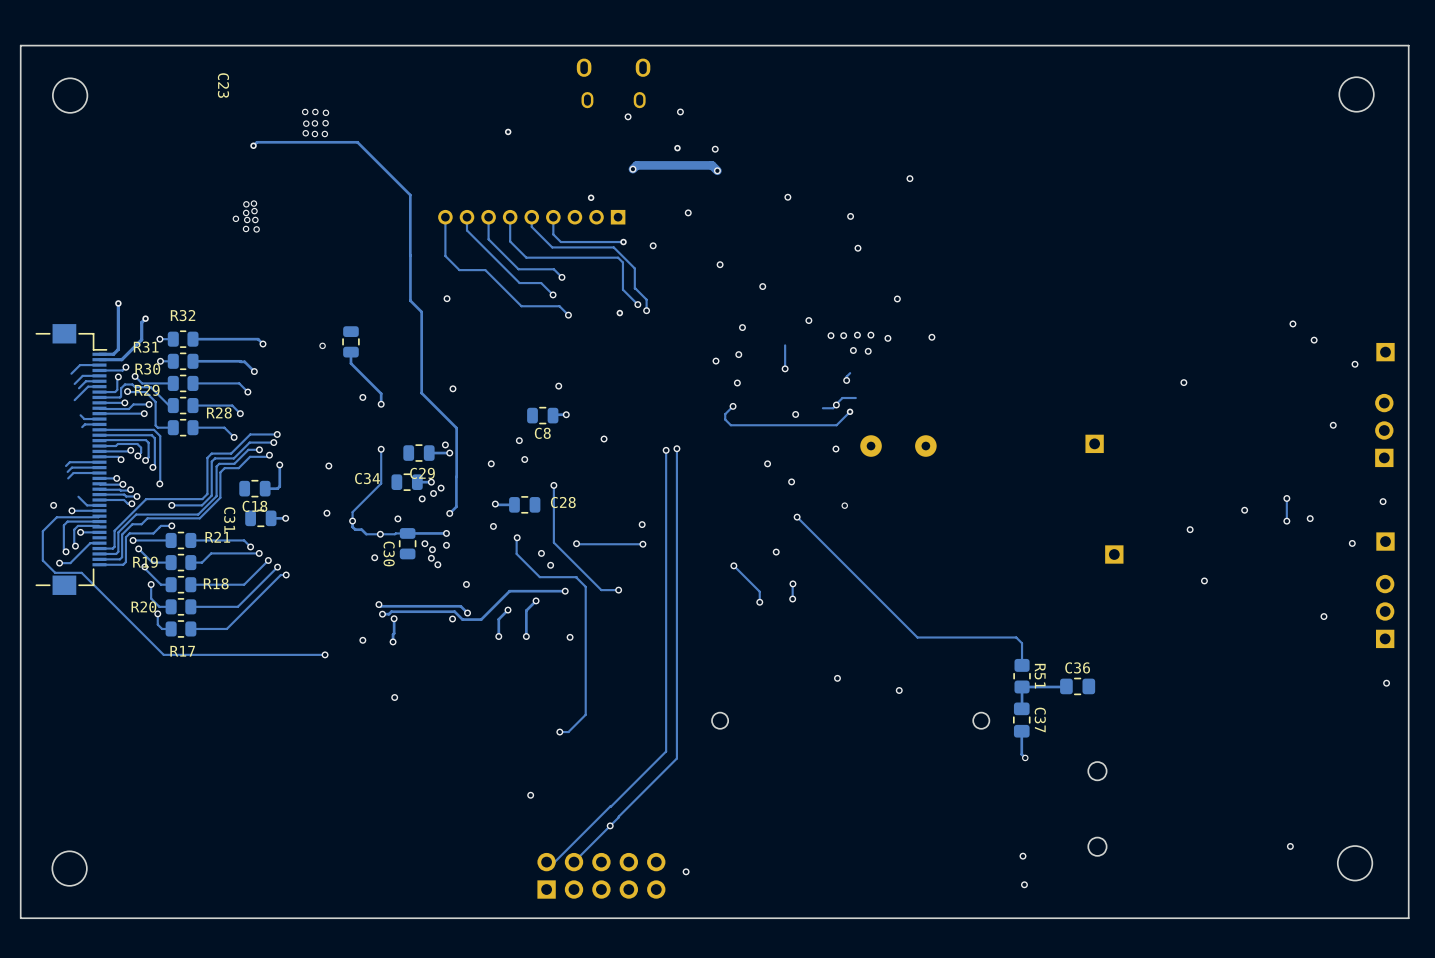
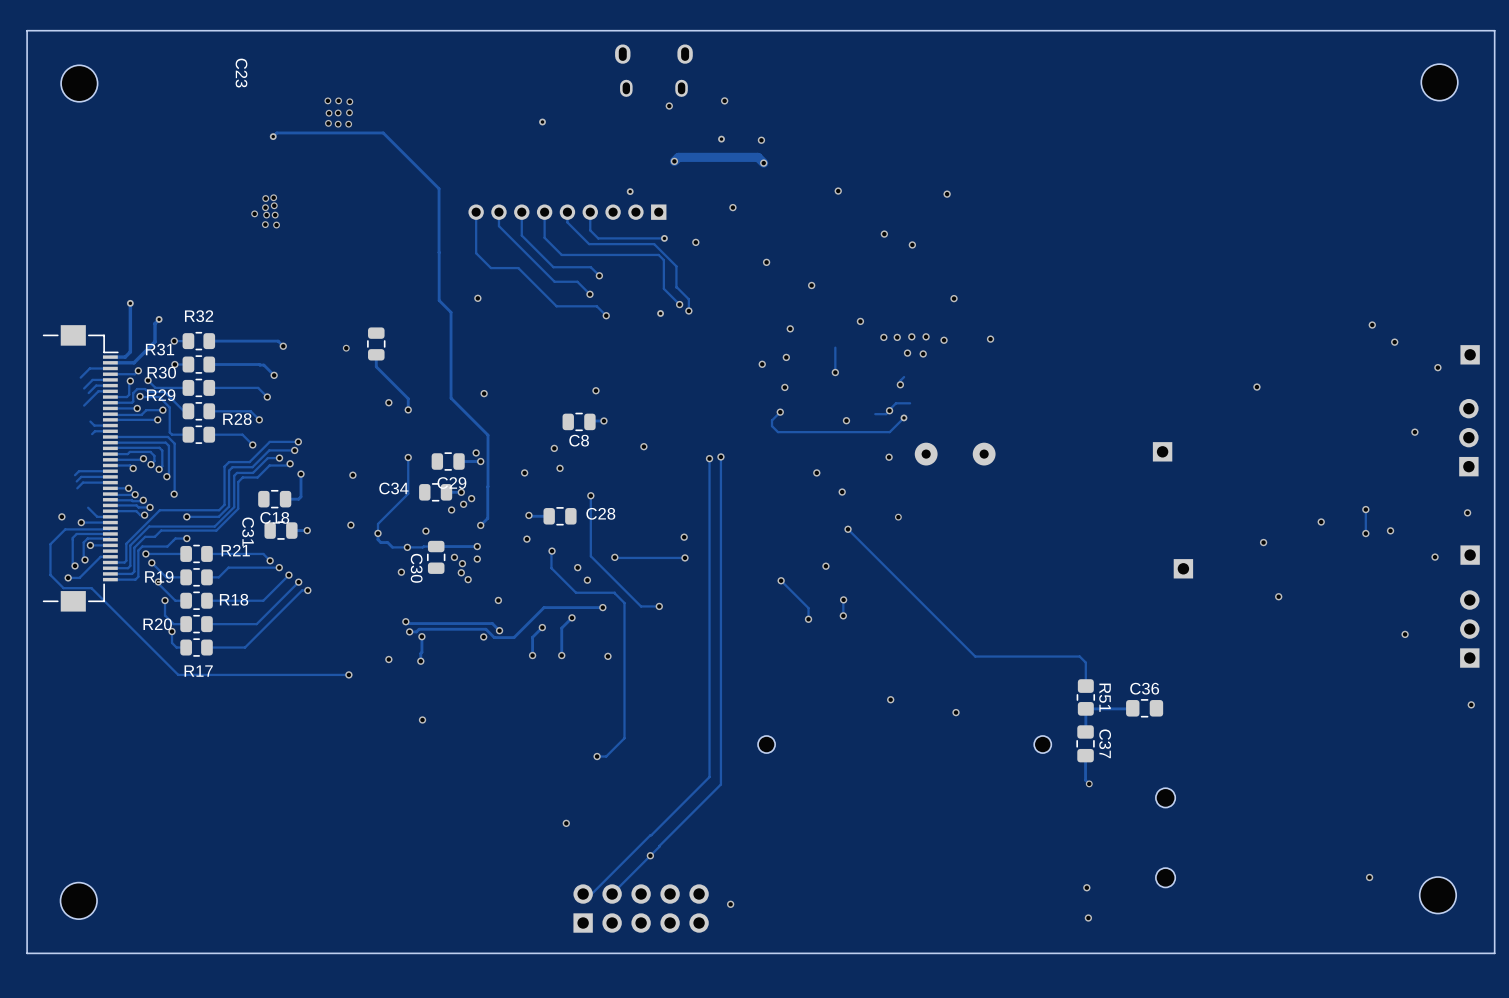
via: (909, 178) -> none
via: none -> (947, 194)
via: (850, 216) -> none
via: none -> (884, 234)

